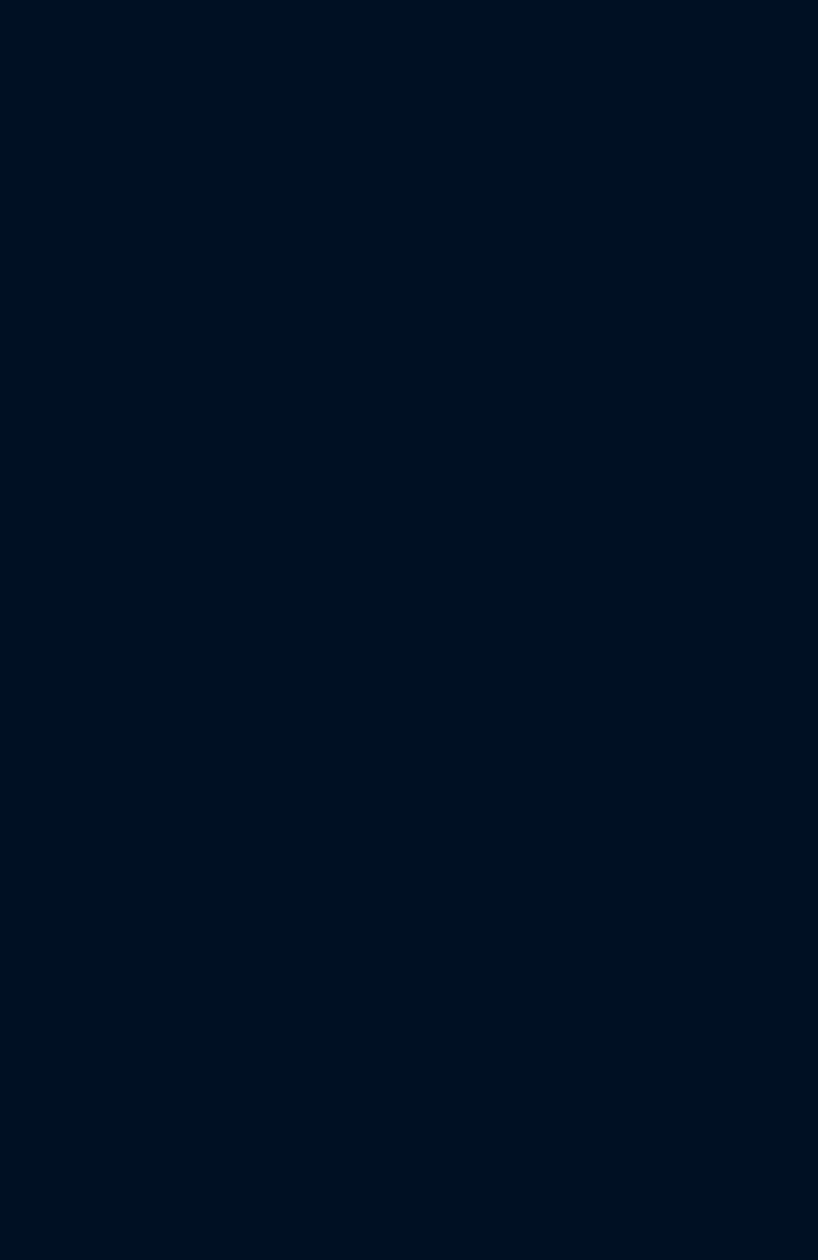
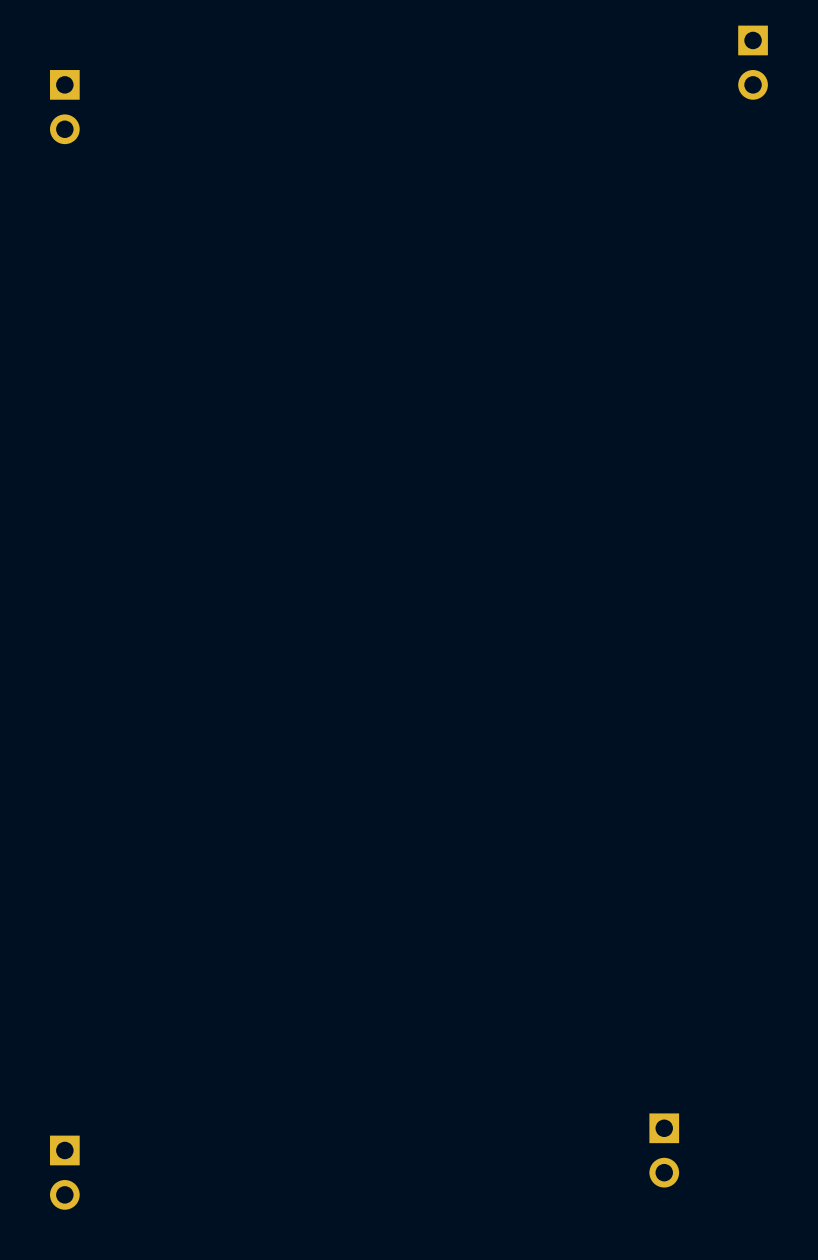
part: none -> (753, 62)
part: none -> (64, 107)
part: none -> (664, 1150)
part: none -> (64, 1172)

